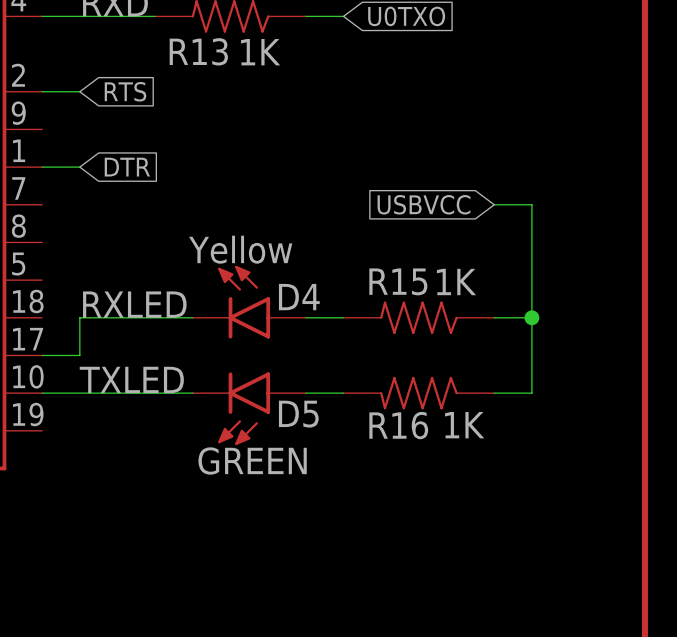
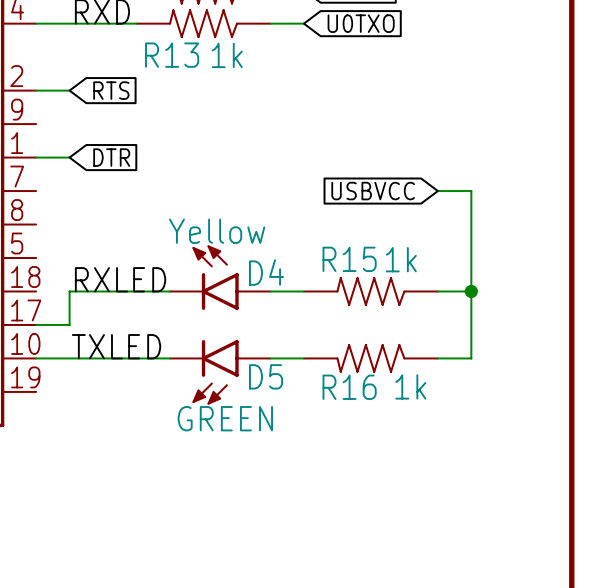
R13 value: 1K (260, 52) -> 1k (227, 55)
R15 value: 1K (456, 282) -> 1k (401, 259)
R16 value: 1K (464, 425) -> 1k (410, 386)

